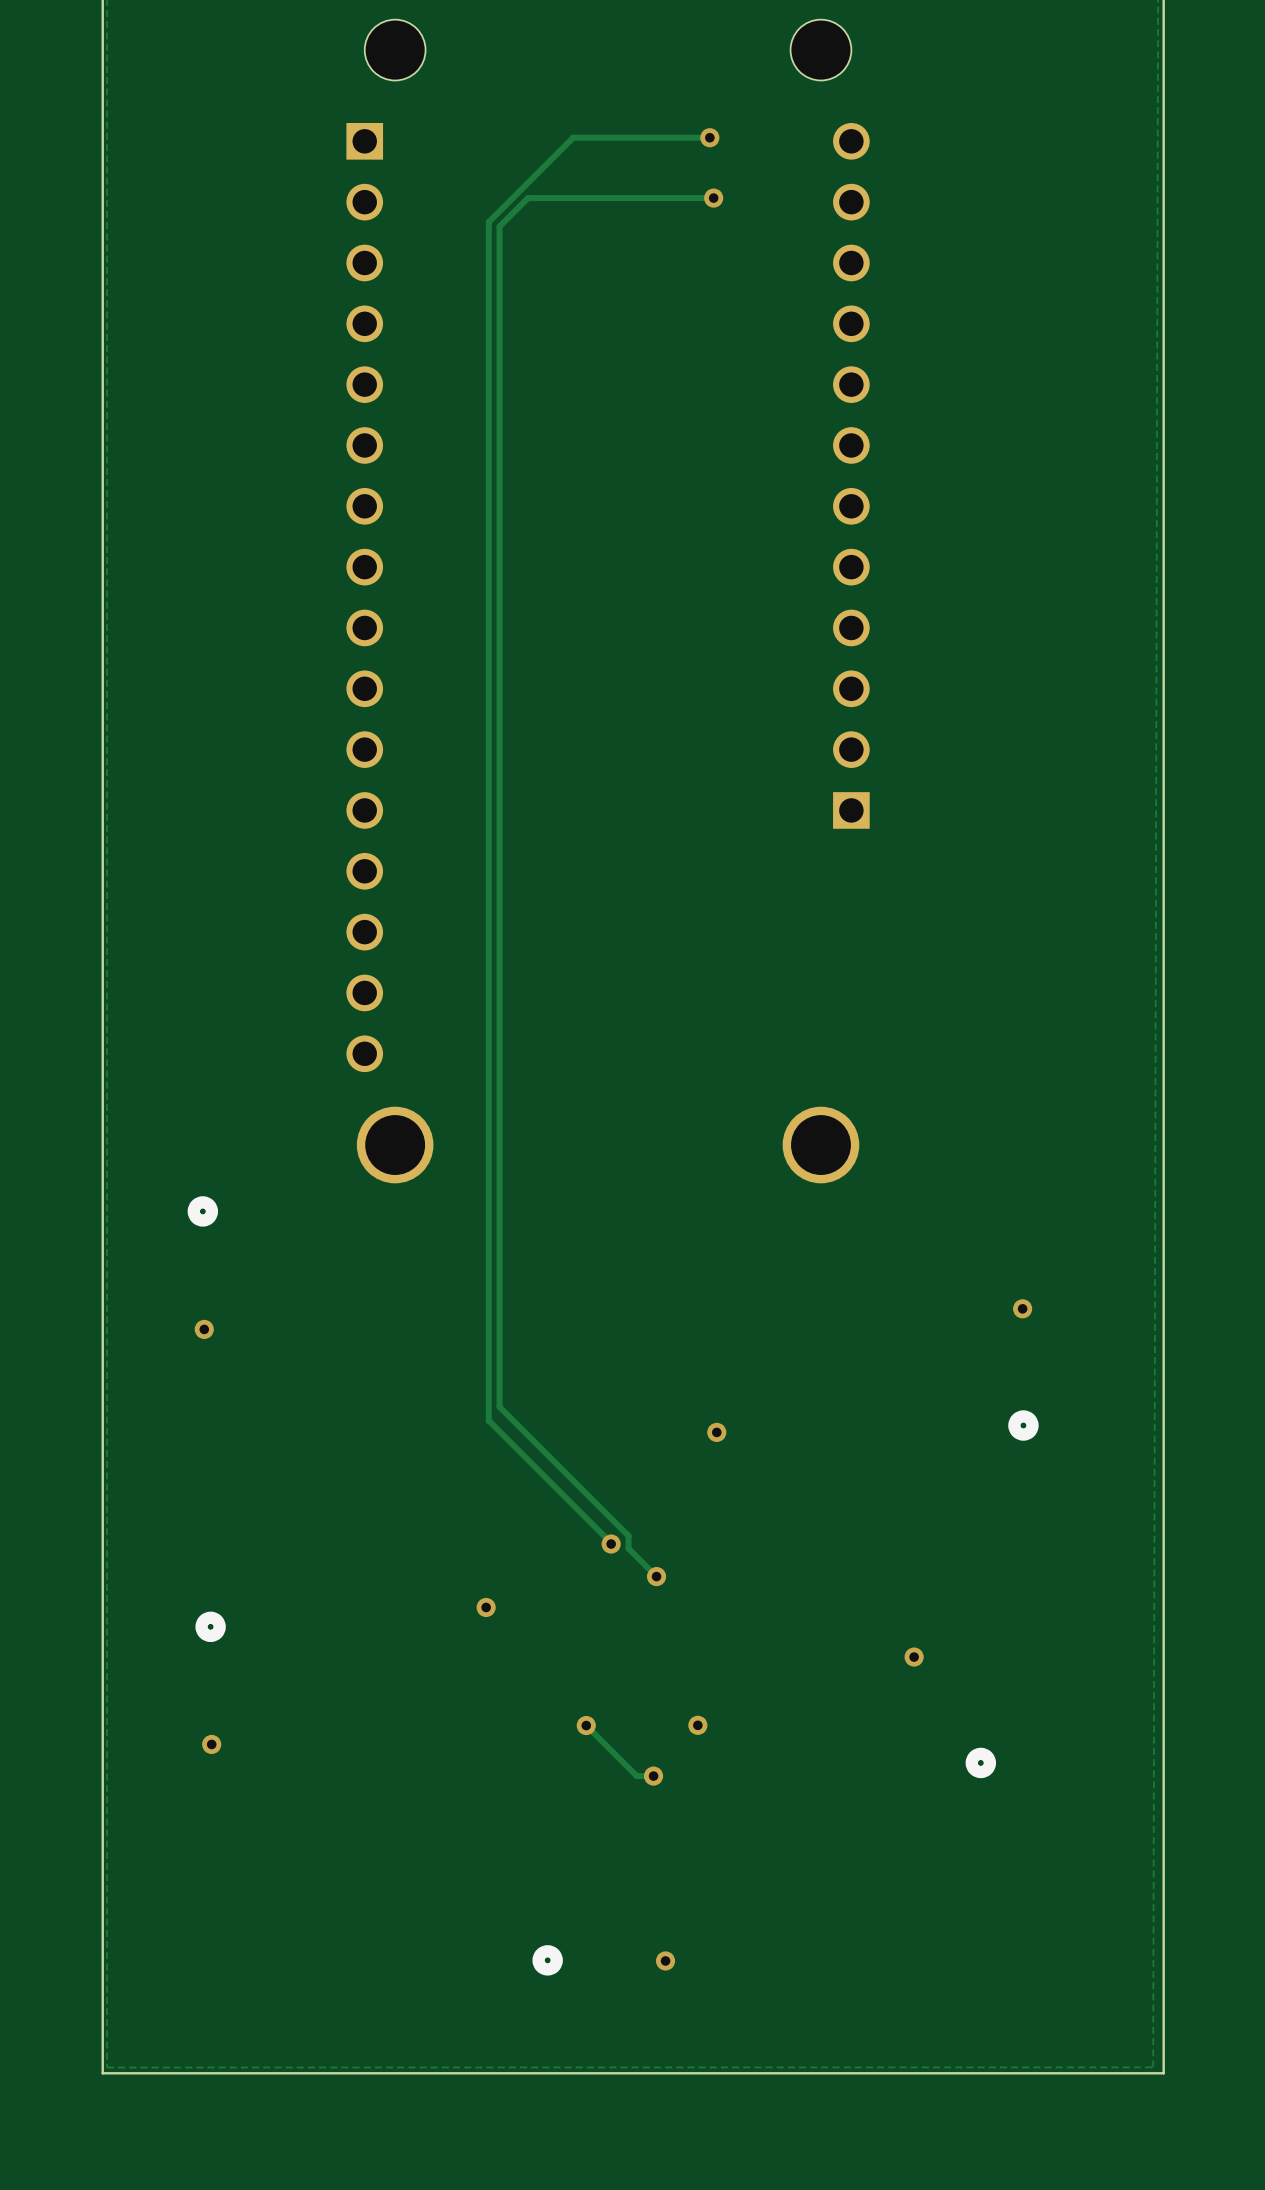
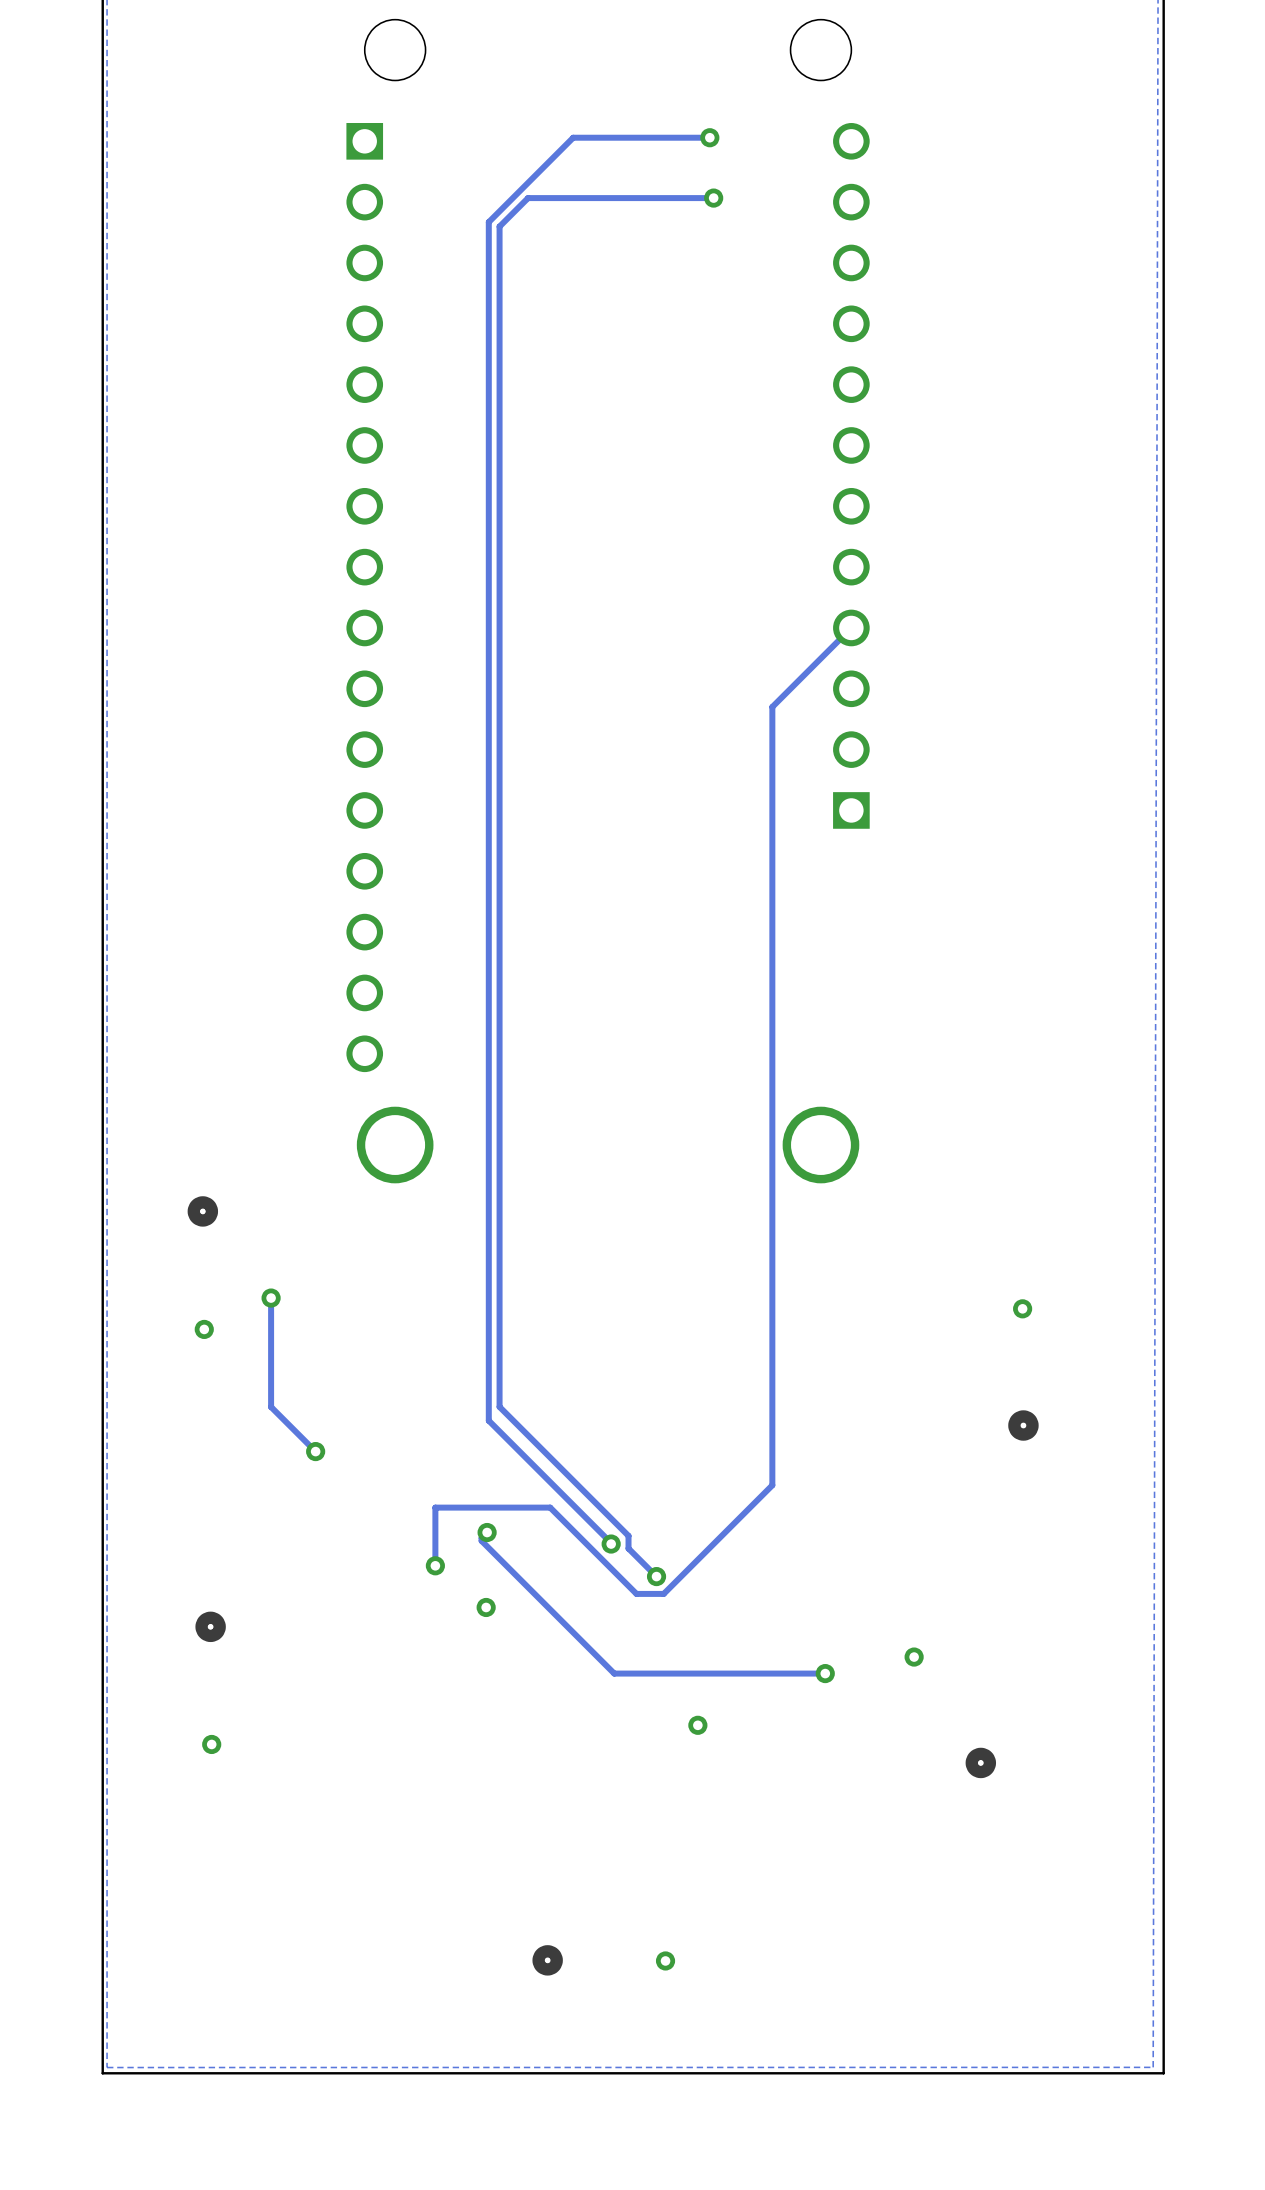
track: none -> (851, 627) (772, 706) (772, 1485) (663, 1593) (636, 1593) (550, 1507) (435, 1507) (435, 1565)
track: none -> (271, 1298) (271, 1407) (315, 1451)
via: none -> (271, 1298)
via: (716, 1432) -> none
via: none -> (315, 1451)
track: none -> (487, 1532) (481, 1538) (481, 1540) (614, 1673) (825, 1673)
via: none -> (487, 1532)
via: none -> (435, 1565)
via: none -> (825, 1673)
track: (586, 1725) (636, 1776) (653, 1776) -> none
via: (586, 1725) -> none
via: (653, 1776) -> none

